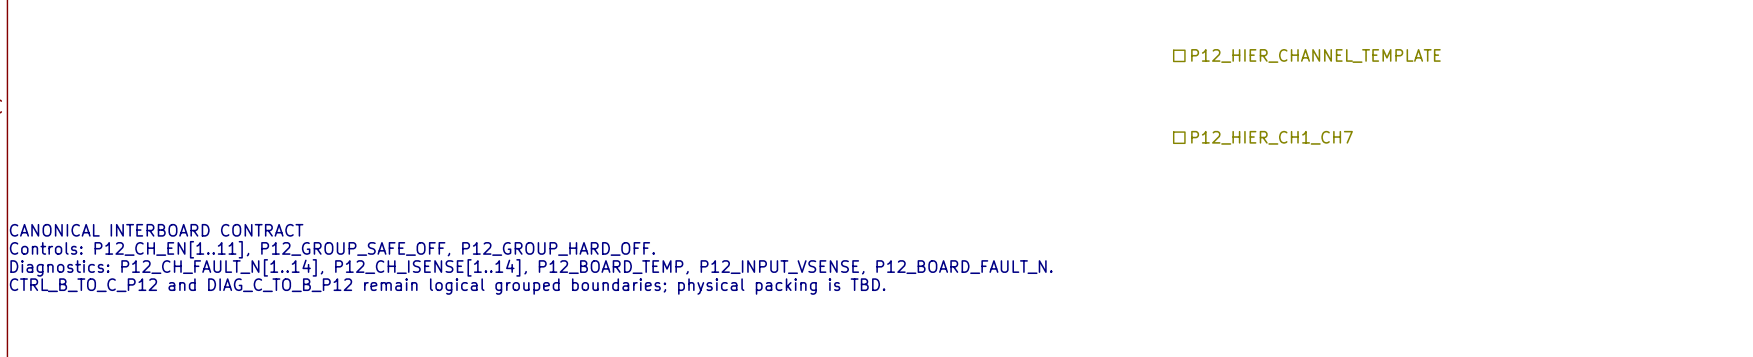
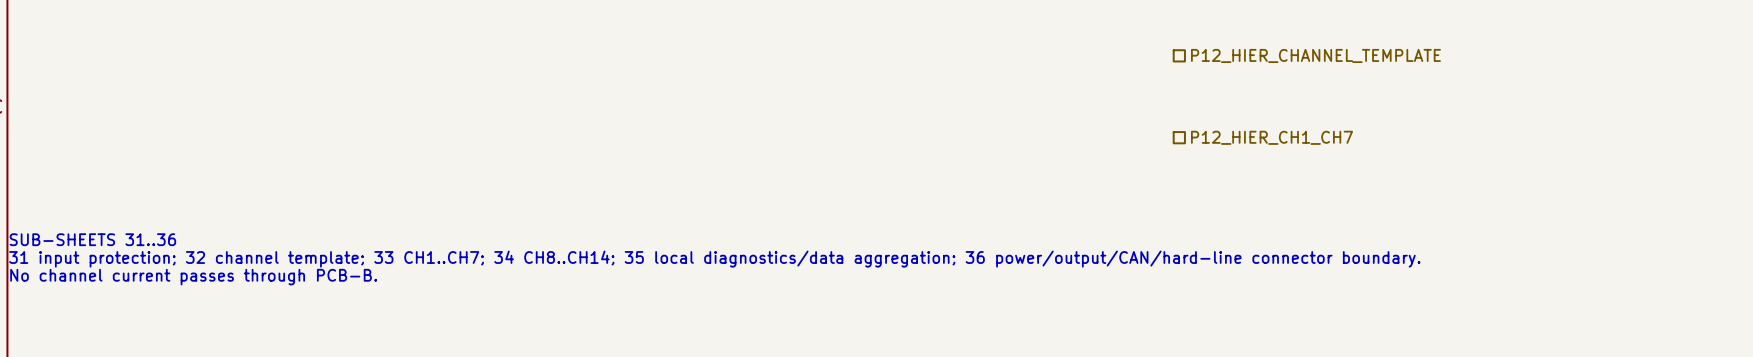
text: CANONICAL INTERBOARD CONTRACT (156, 230) -> none
text: none -> SUB-SHEETS 31..36 (92, 239)
text: Controls: P12_CH_EN[1..11], P12_GROUP_SAFE_OFF, P12_GROUP_HARD_OFF. (332, 249) -> none
text: none -> 31 input protection; 32 channel template; 33 CH1..CH7; 34 CH8..CH14; 35 local diagnostics/data aggregation; 36 power/output/CAN/hard-line connector boundary. (714, 259)
text: Diagnostics: P12_CH_FAULT_N[1..14], P12_CH_ISENSE[1..14], P12_BOARD_TEMP, P12_INPUT_VSENSE, P12_BOARD_FAULT_N. (531, 267) -> none
text: none -> No channel current passes through PCB-B. (193, 277)
text: CTRL_B_TO_C_P12 and DIAG_C_TO_B_P12 remain logical grouped boundaries; physical packing is TBD. (447, 286) -> none

